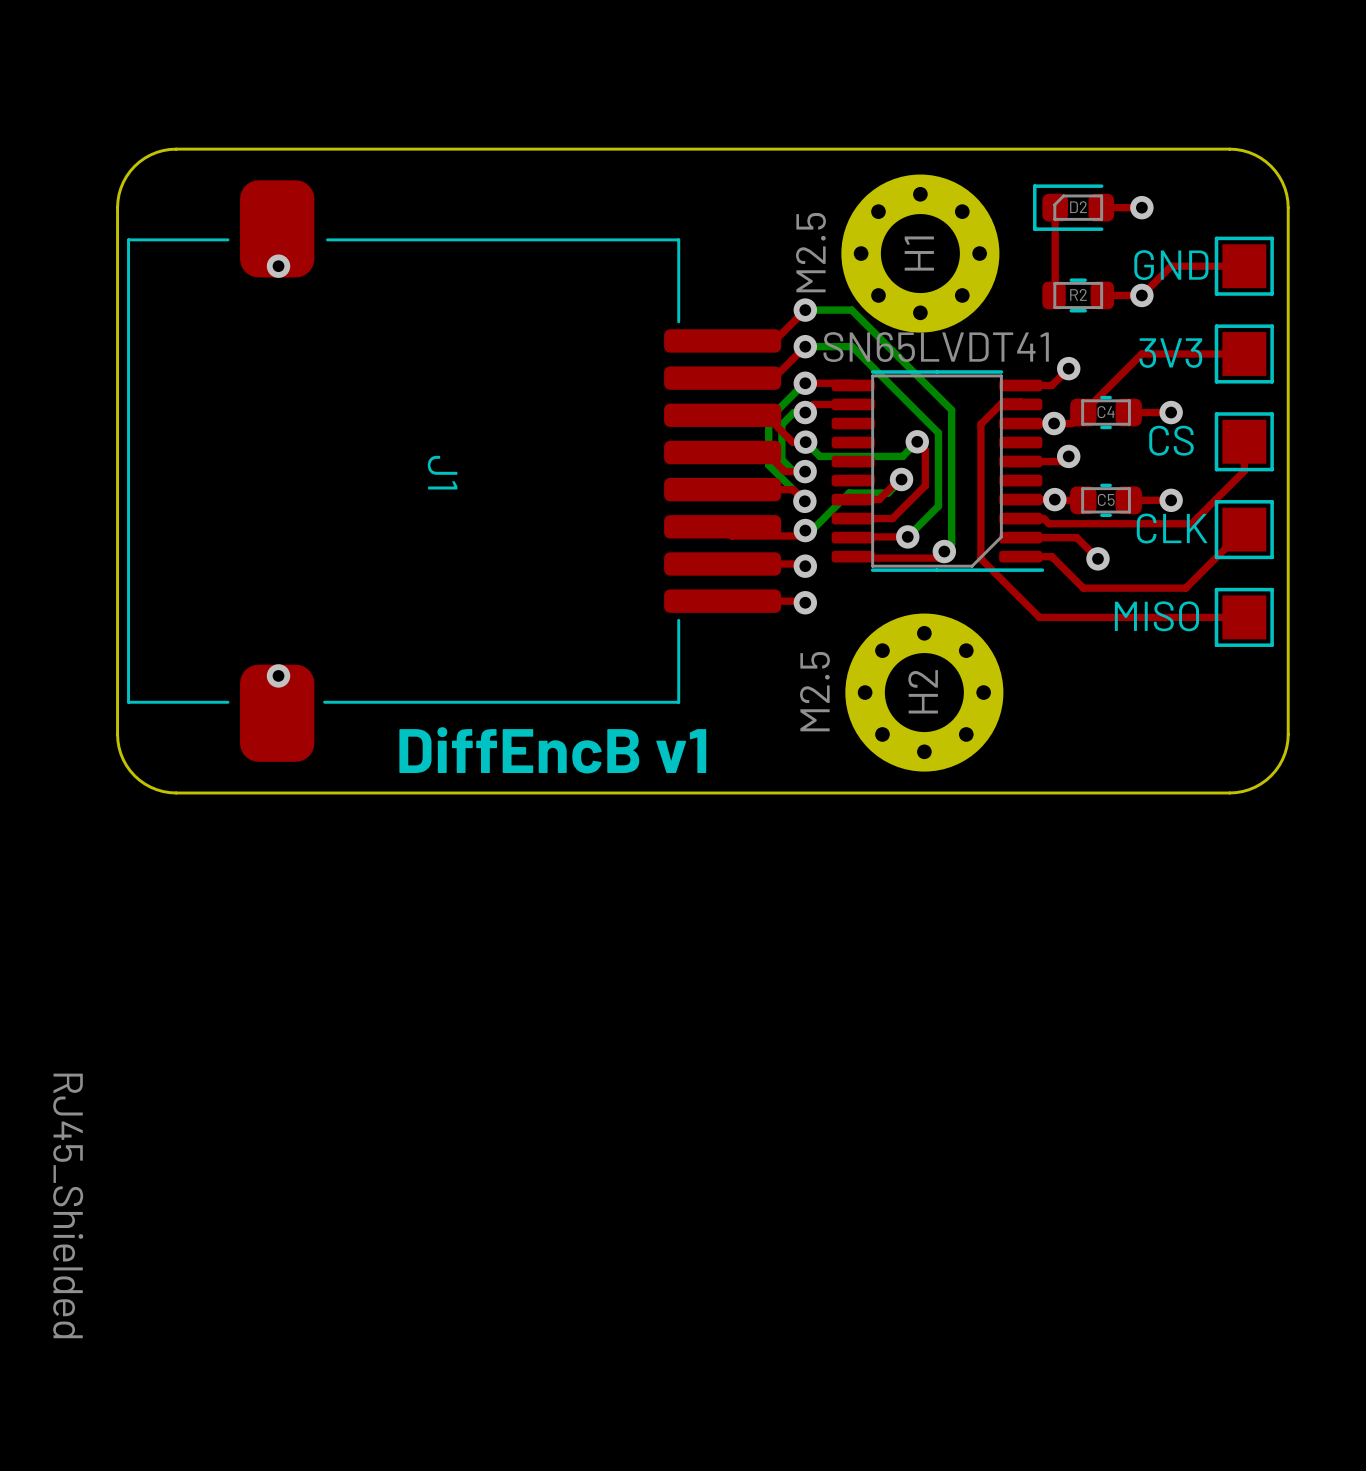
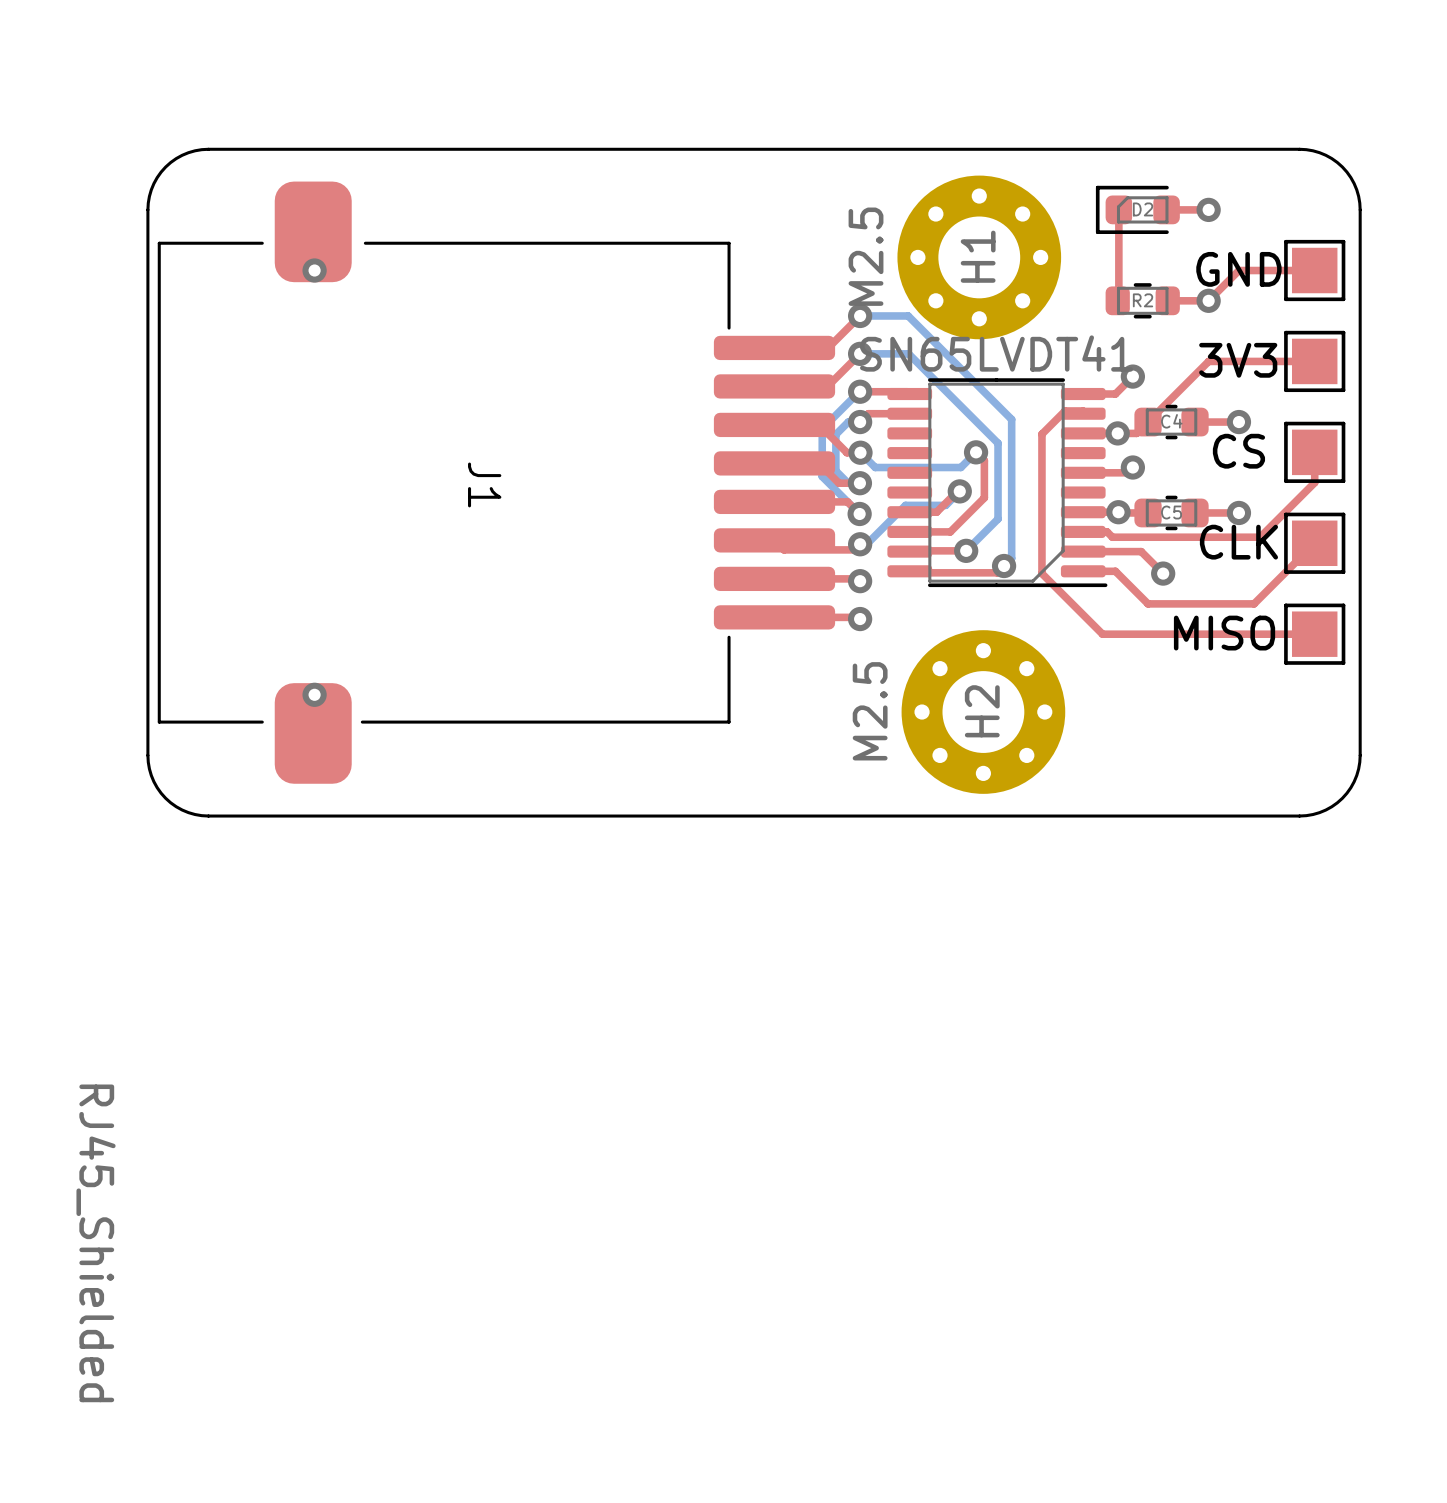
text: DiffEncB v1 (552, 750) -> none

